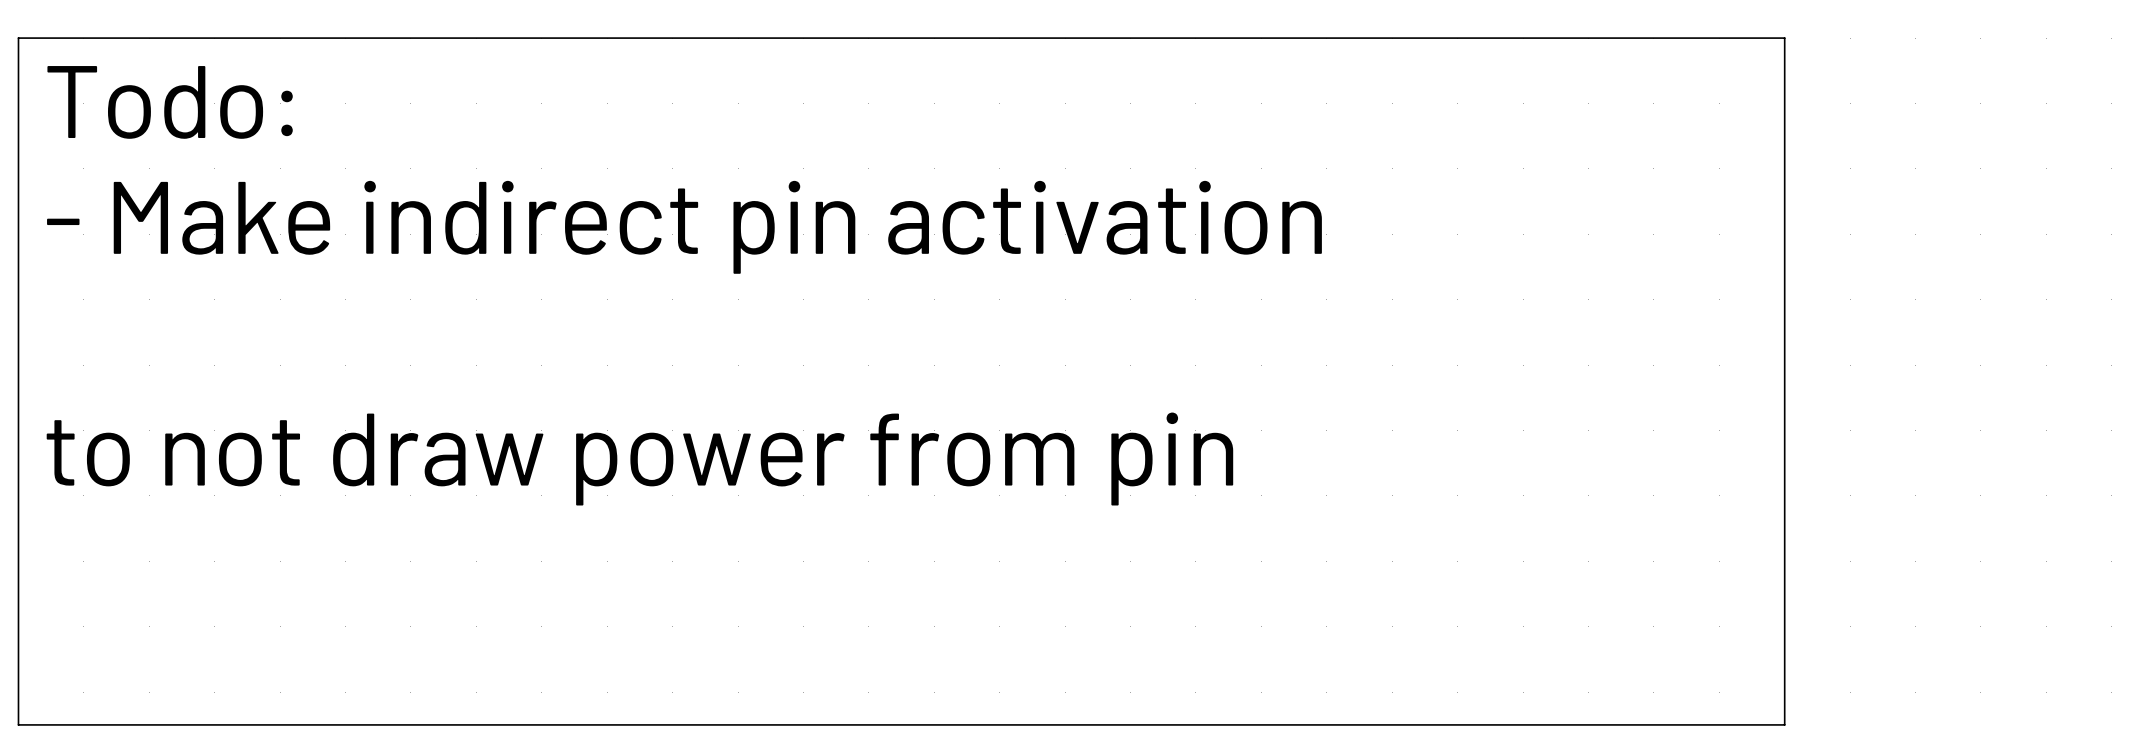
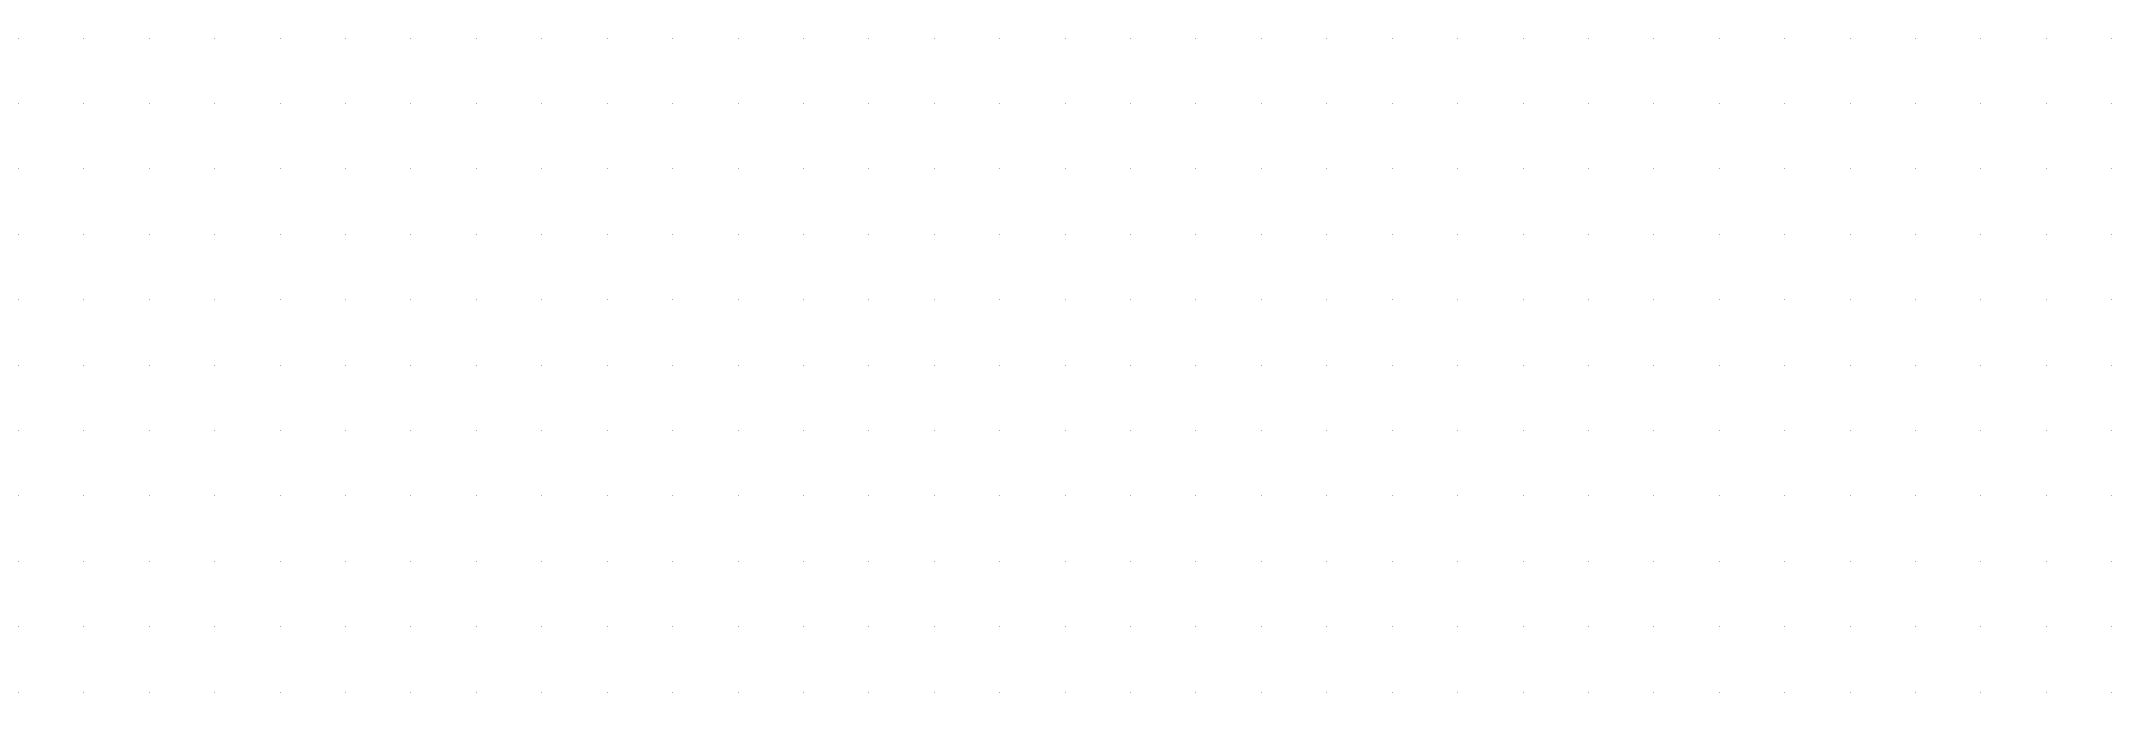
line: (18, 38) (1784, 38) (1784, 724) (18, 724) (18, 38) -> none
text: Todo: (170, 102) -> none
text: - Make indirect pin activation (684, 227) -> none
text: to not draw power from pin (639, 459) -> none

